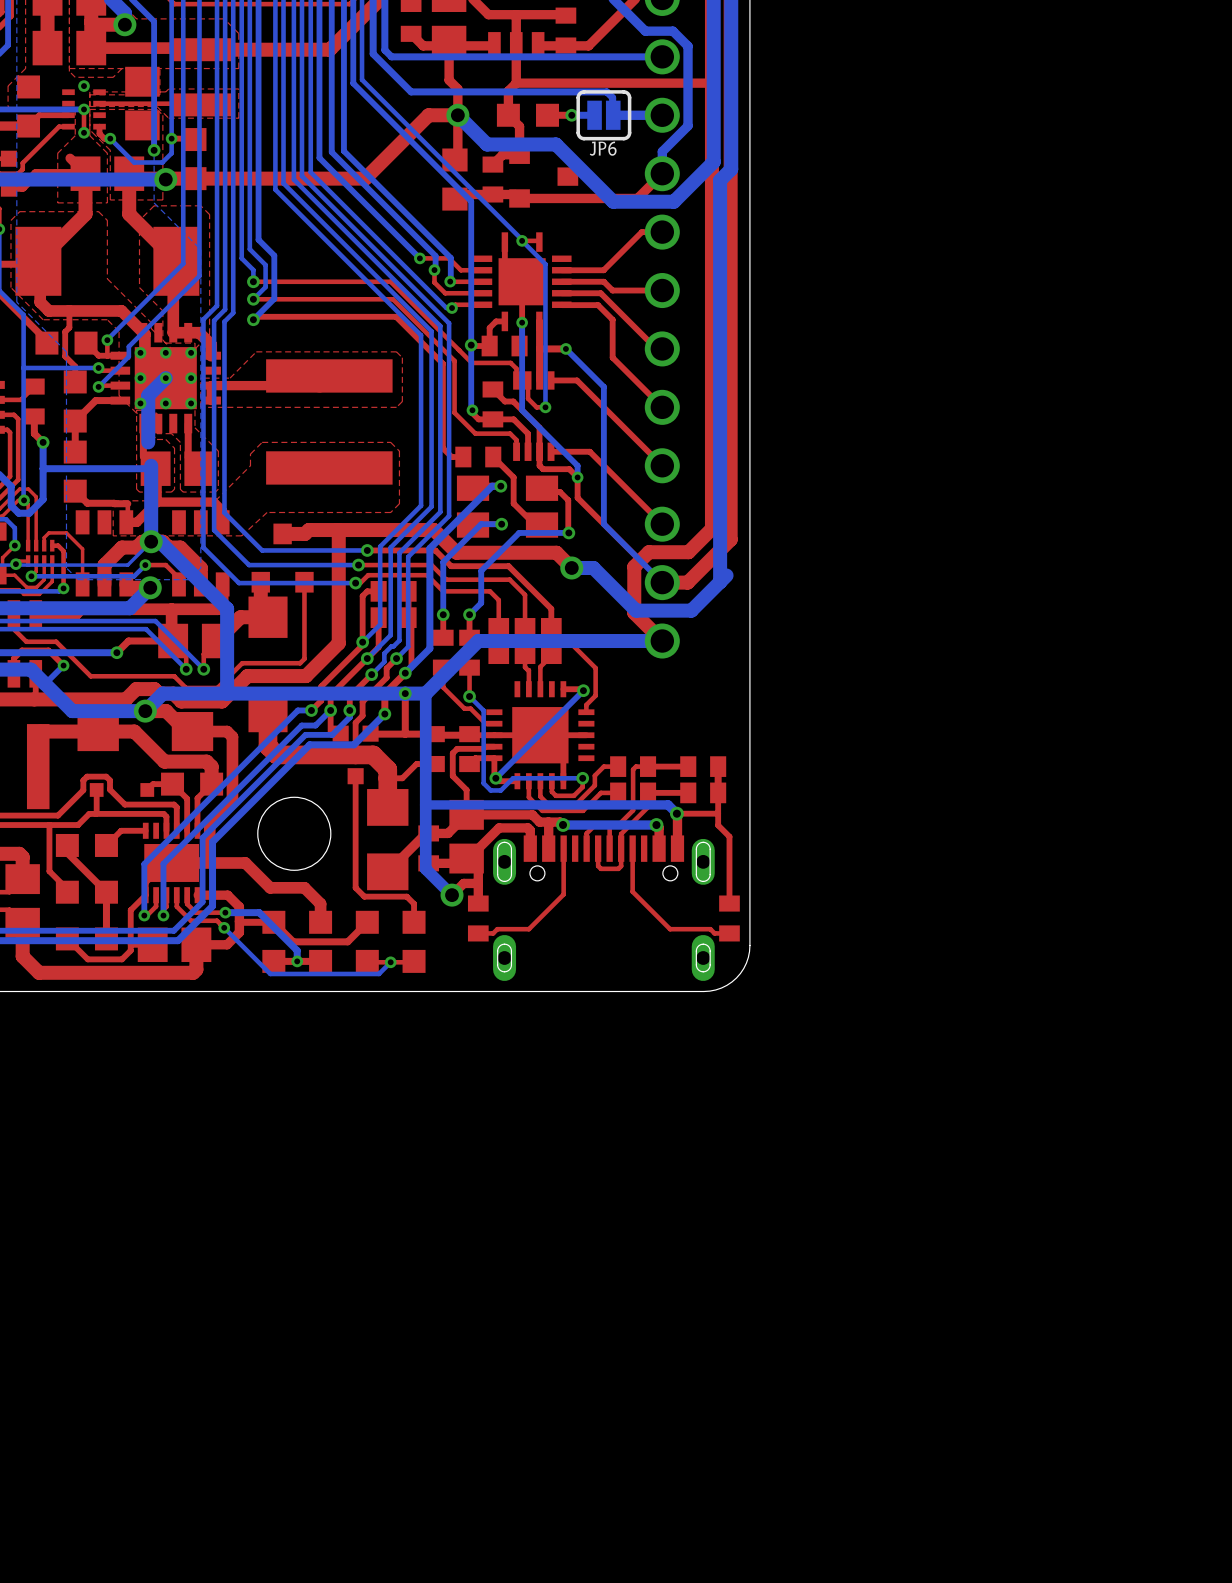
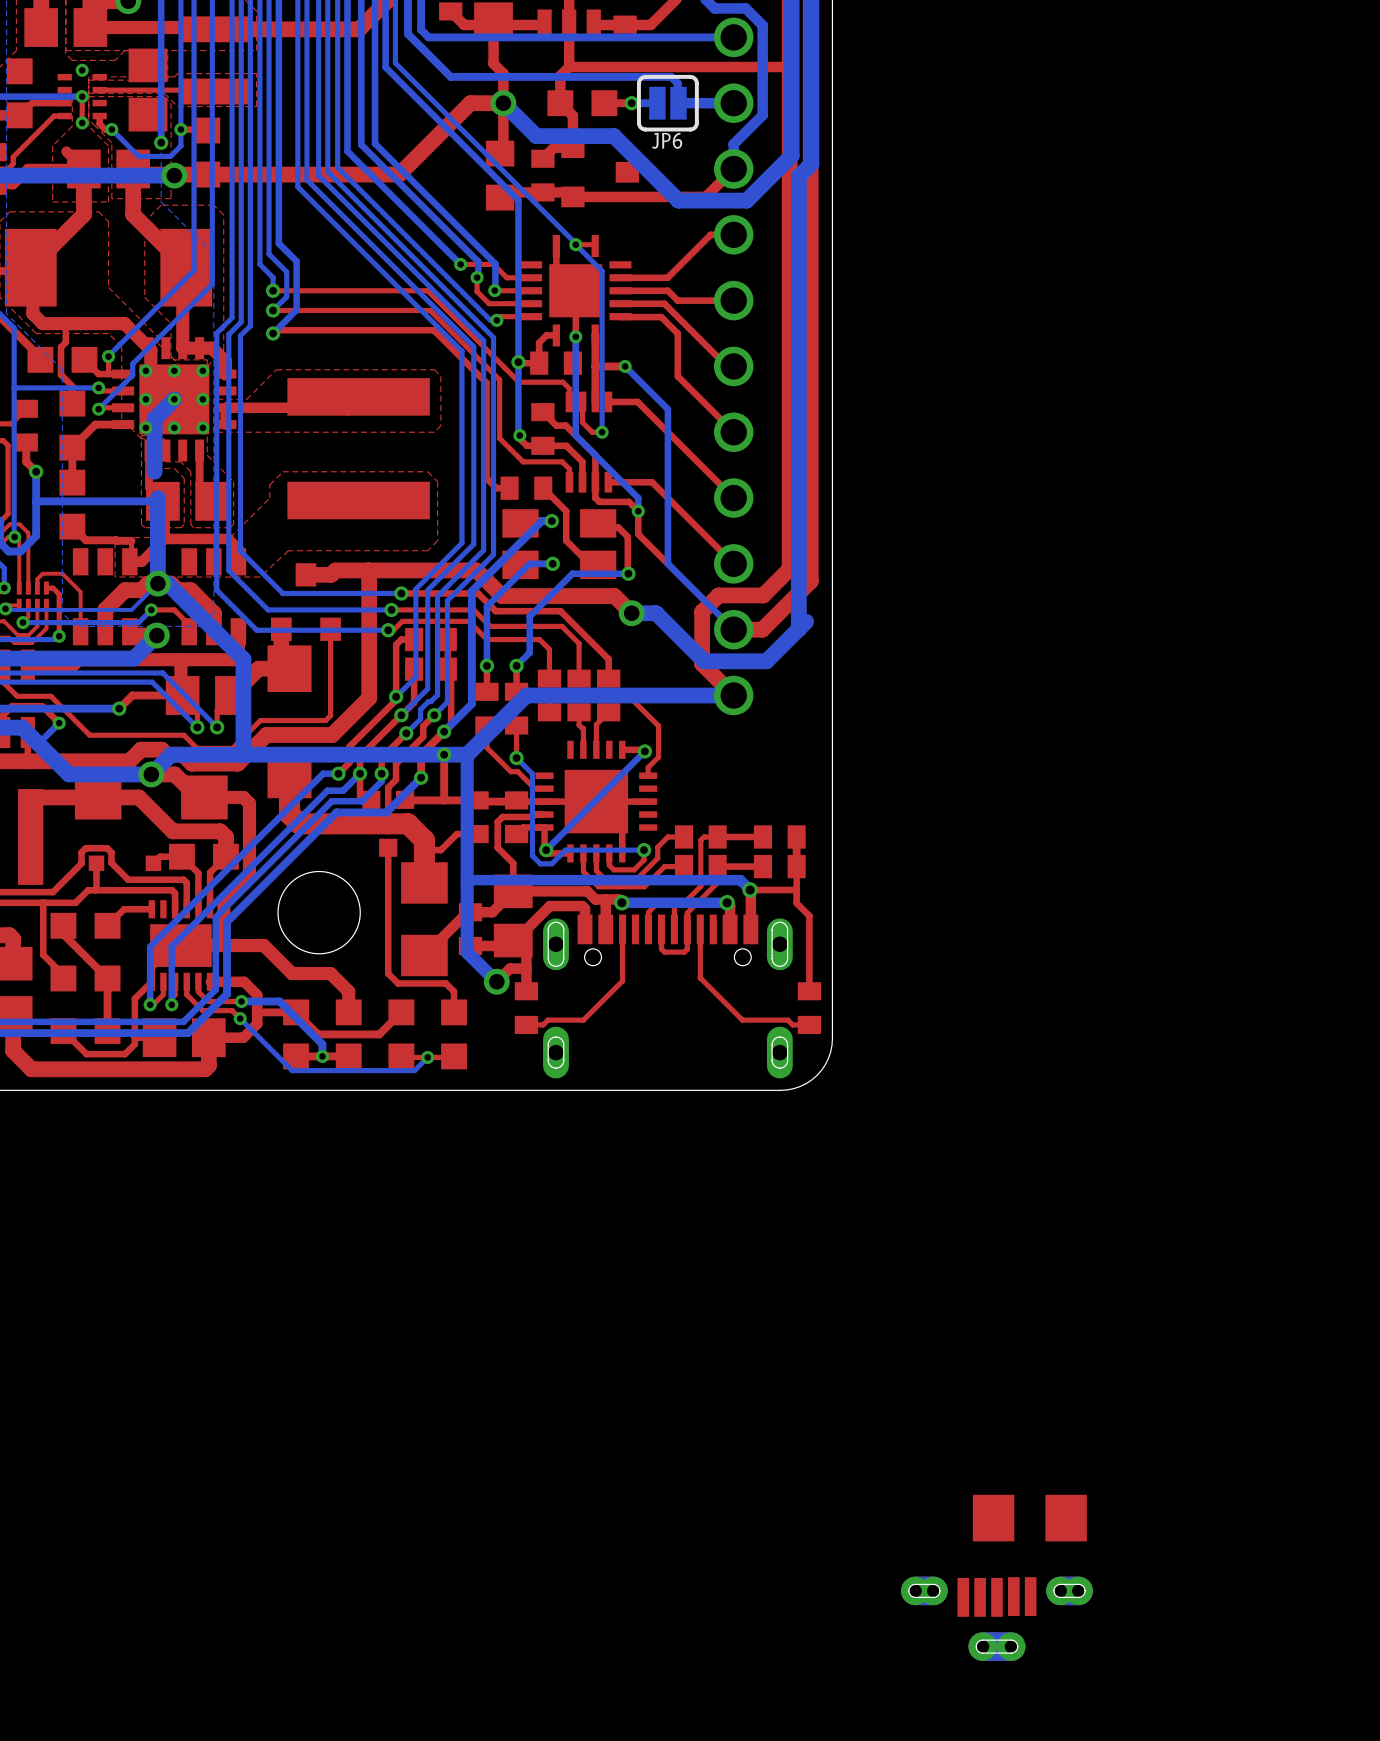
part: none -> (1029, 1518)
part: none -> (996, 1618)

